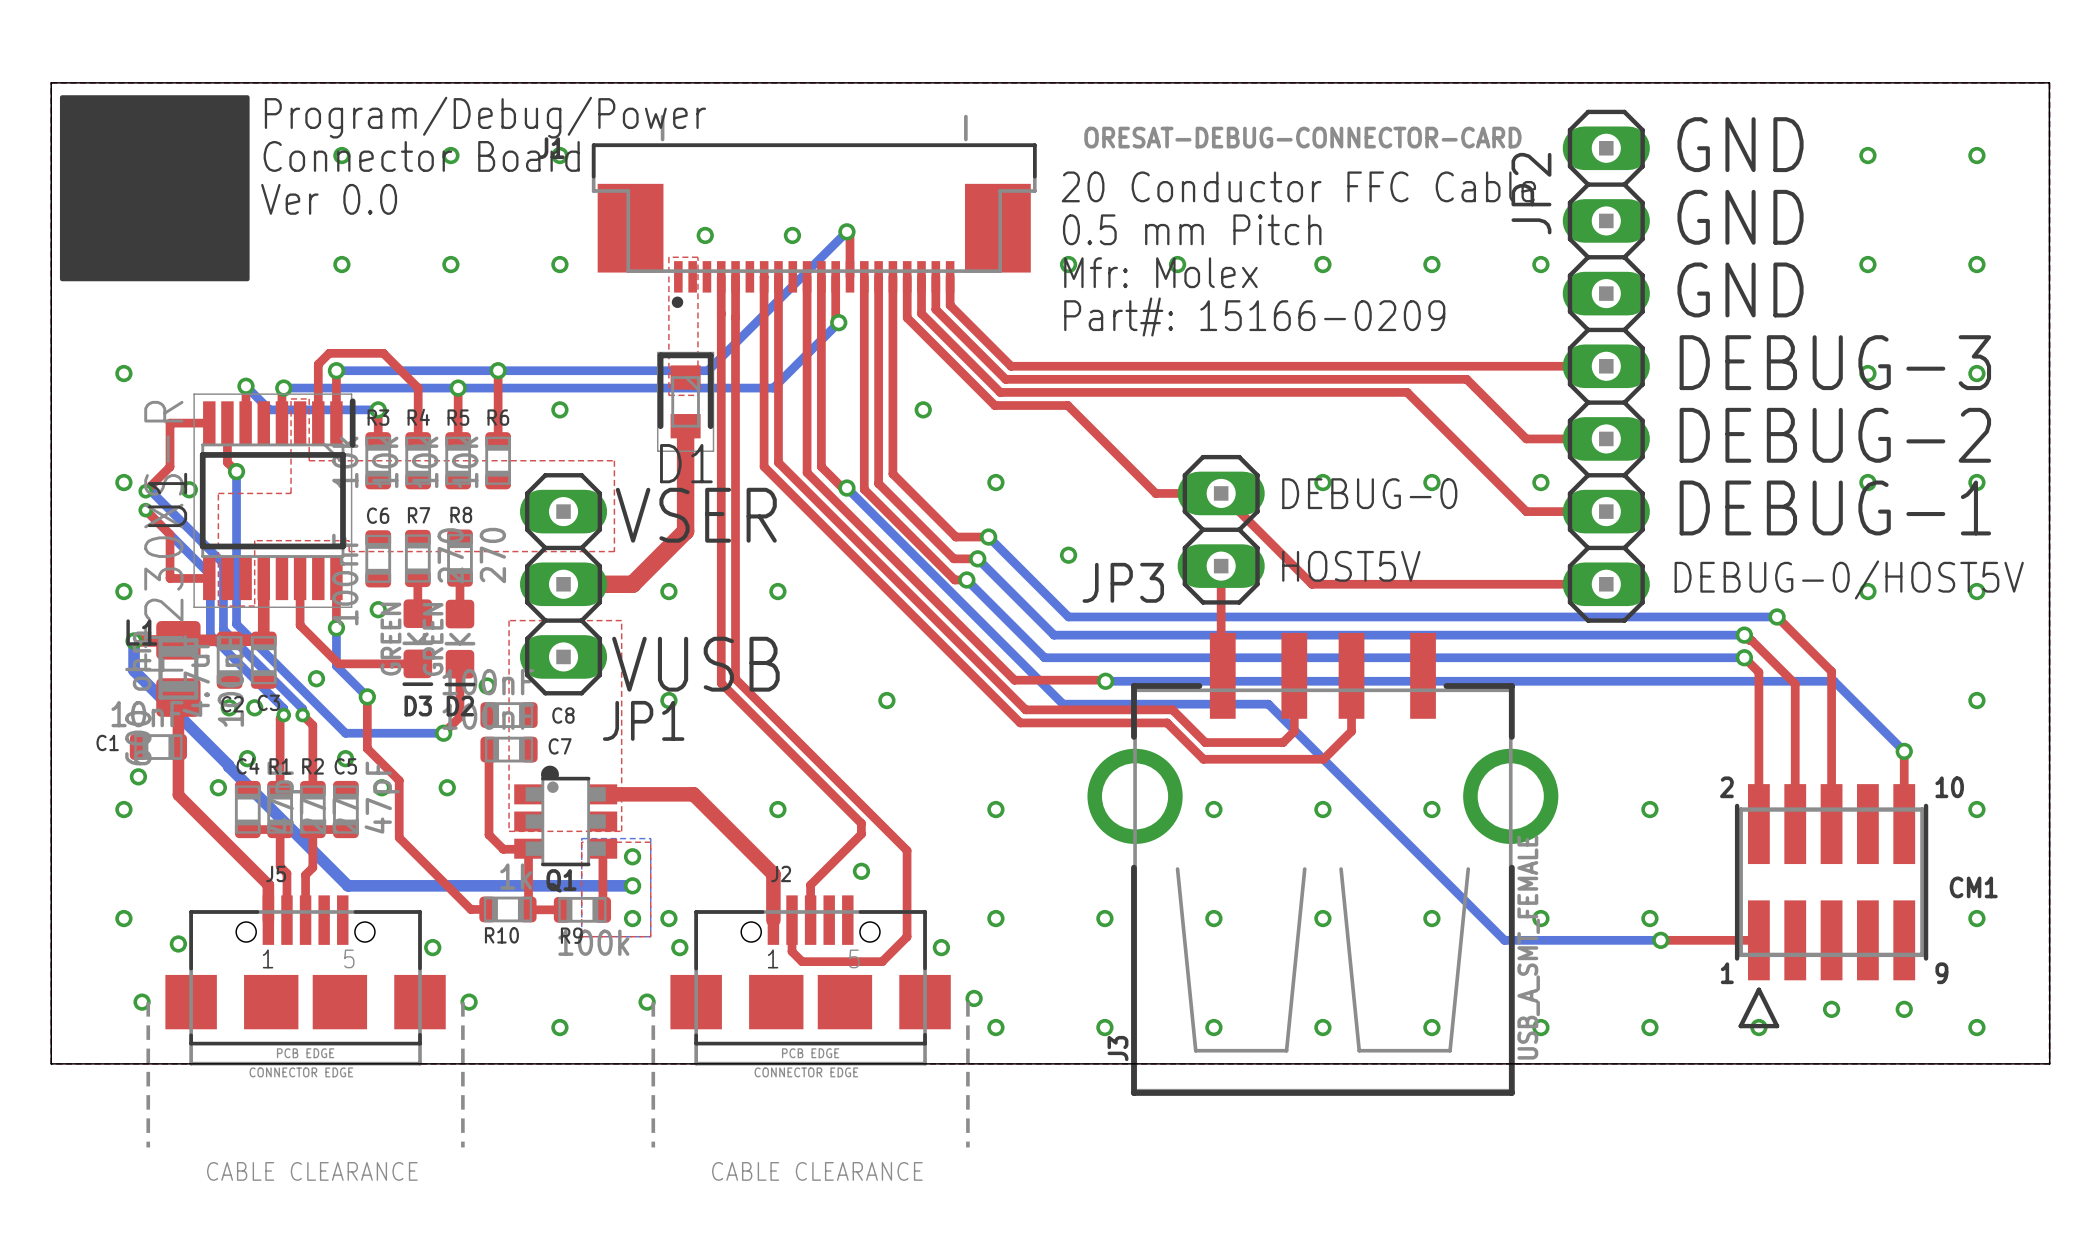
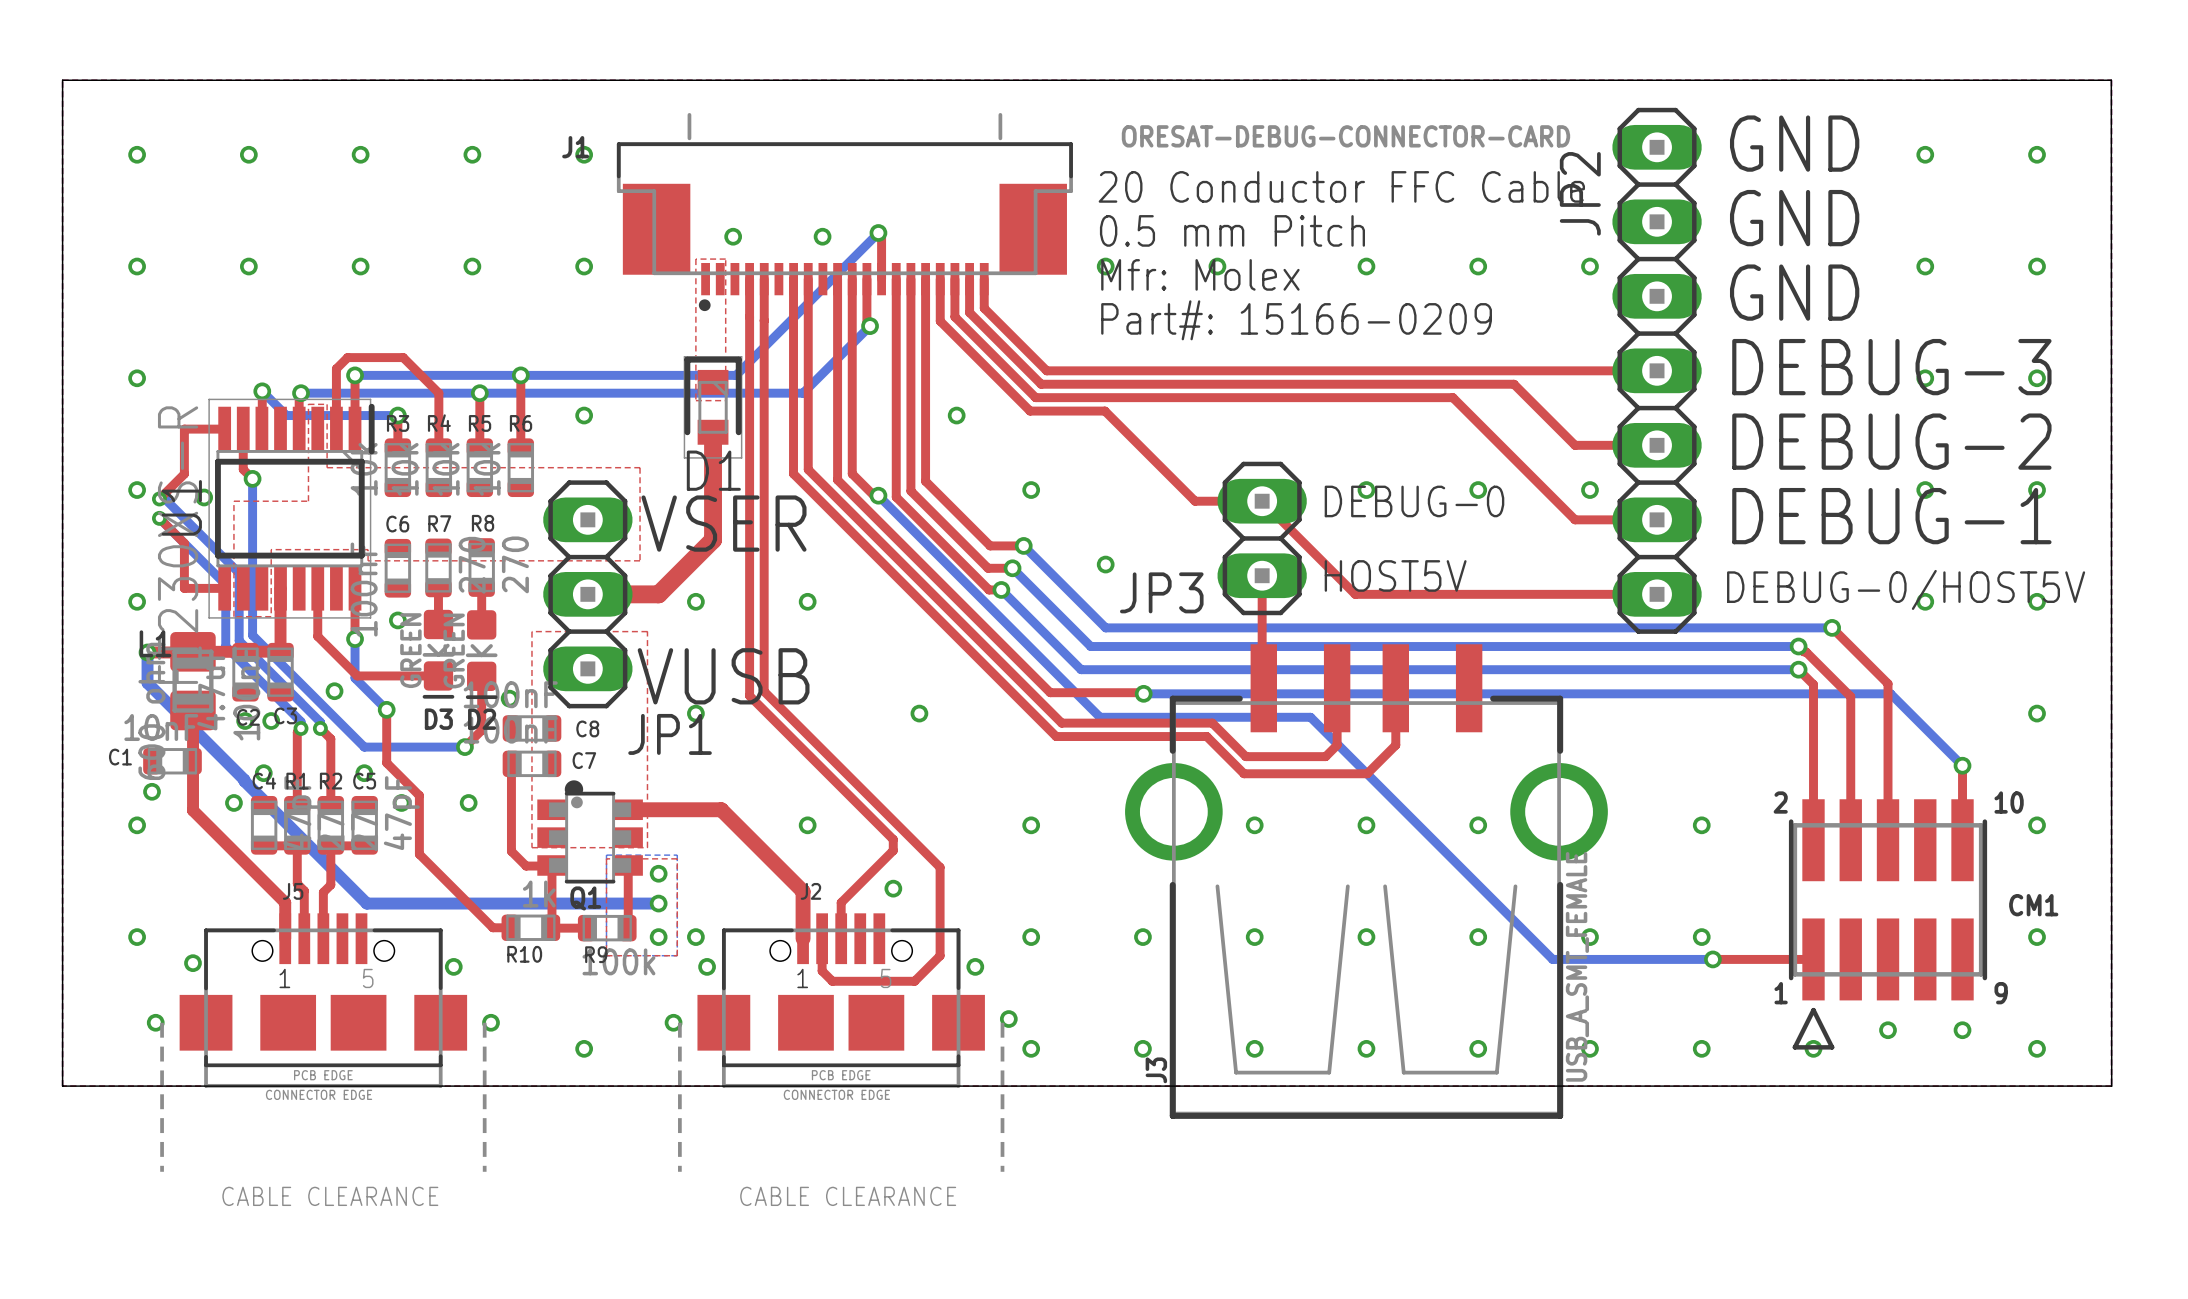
drawing: [59, 95, 250, 282] -> none
text: Program/Debug/Power (485, 117) -> none
text: Connector Board (421, 156) -> none
text: Ver 0.0 (329, 199) -> none

